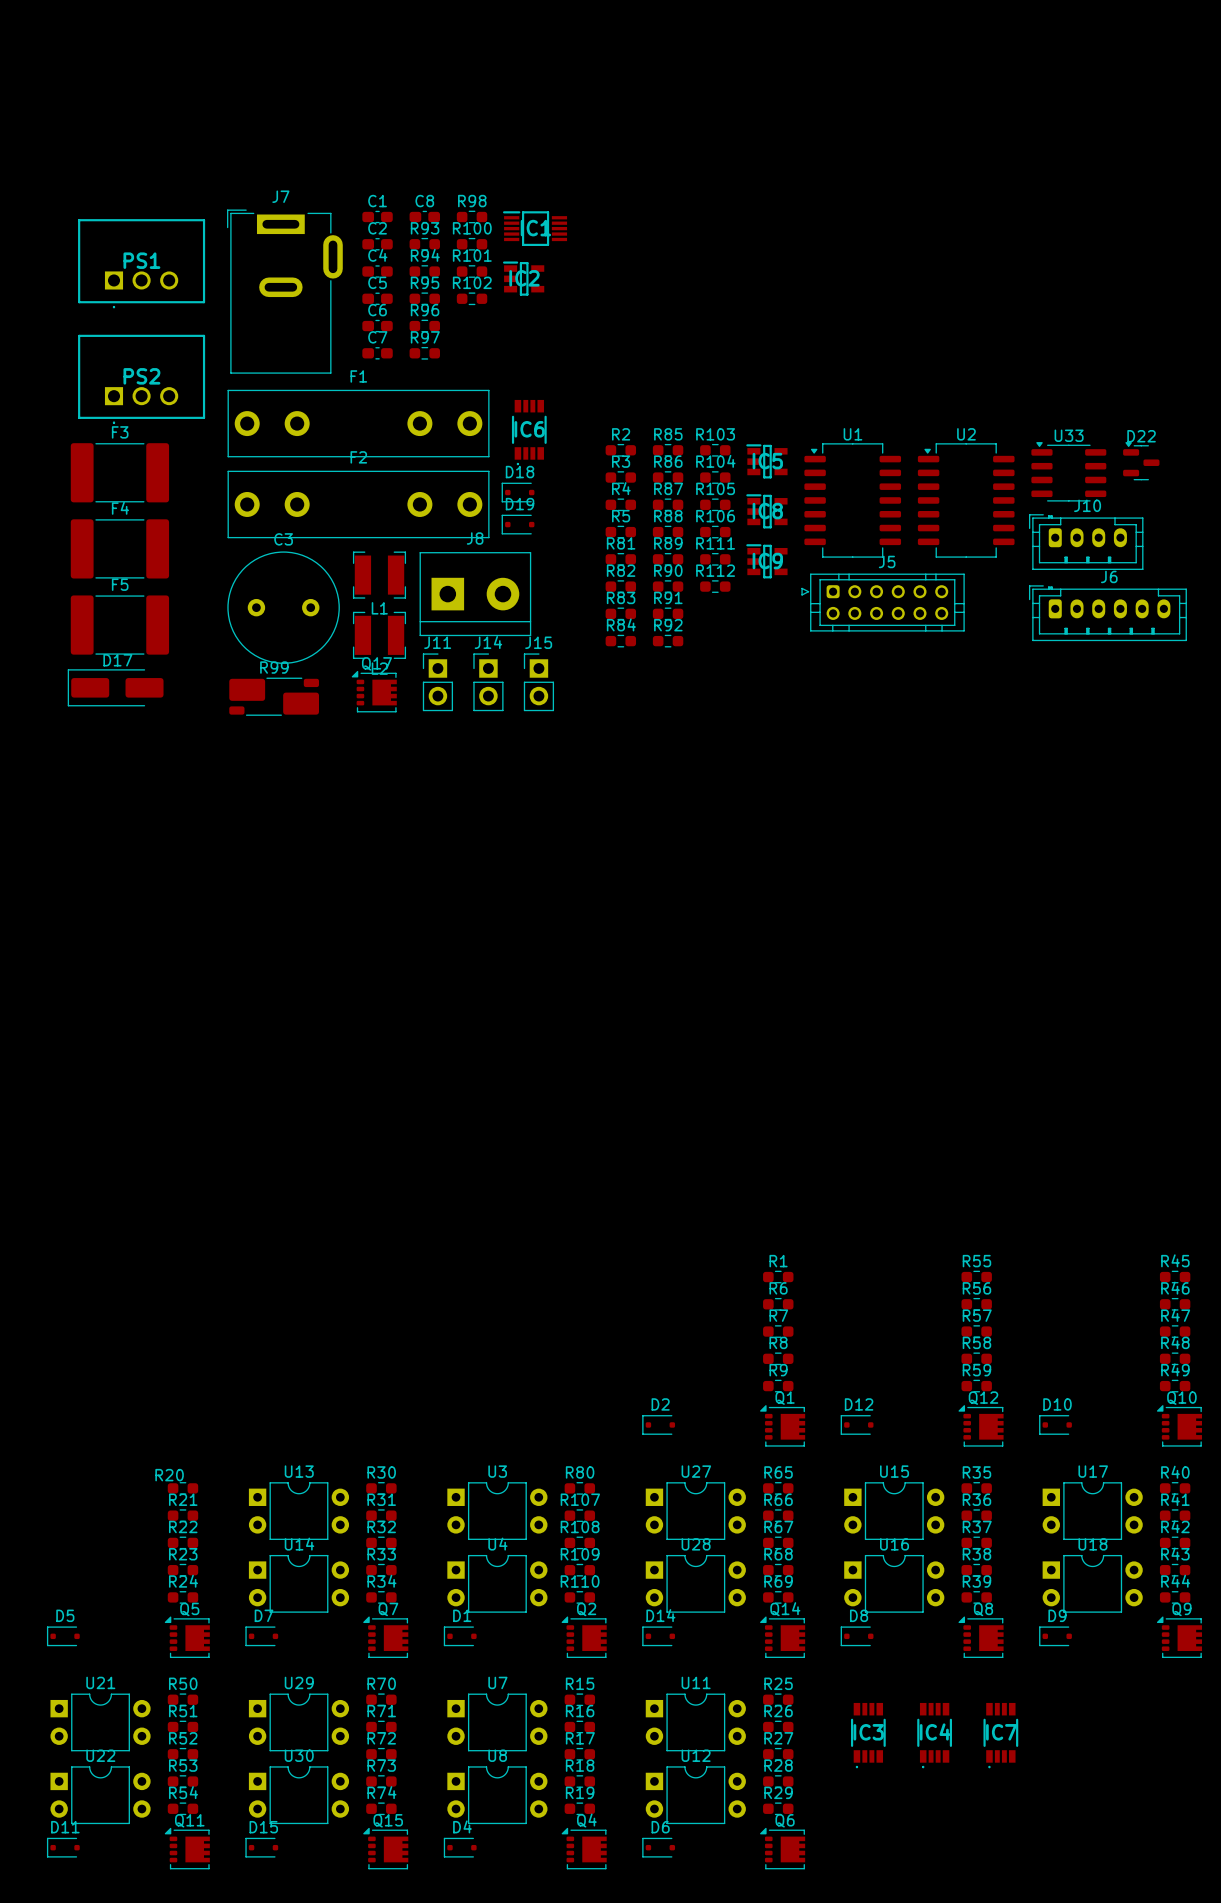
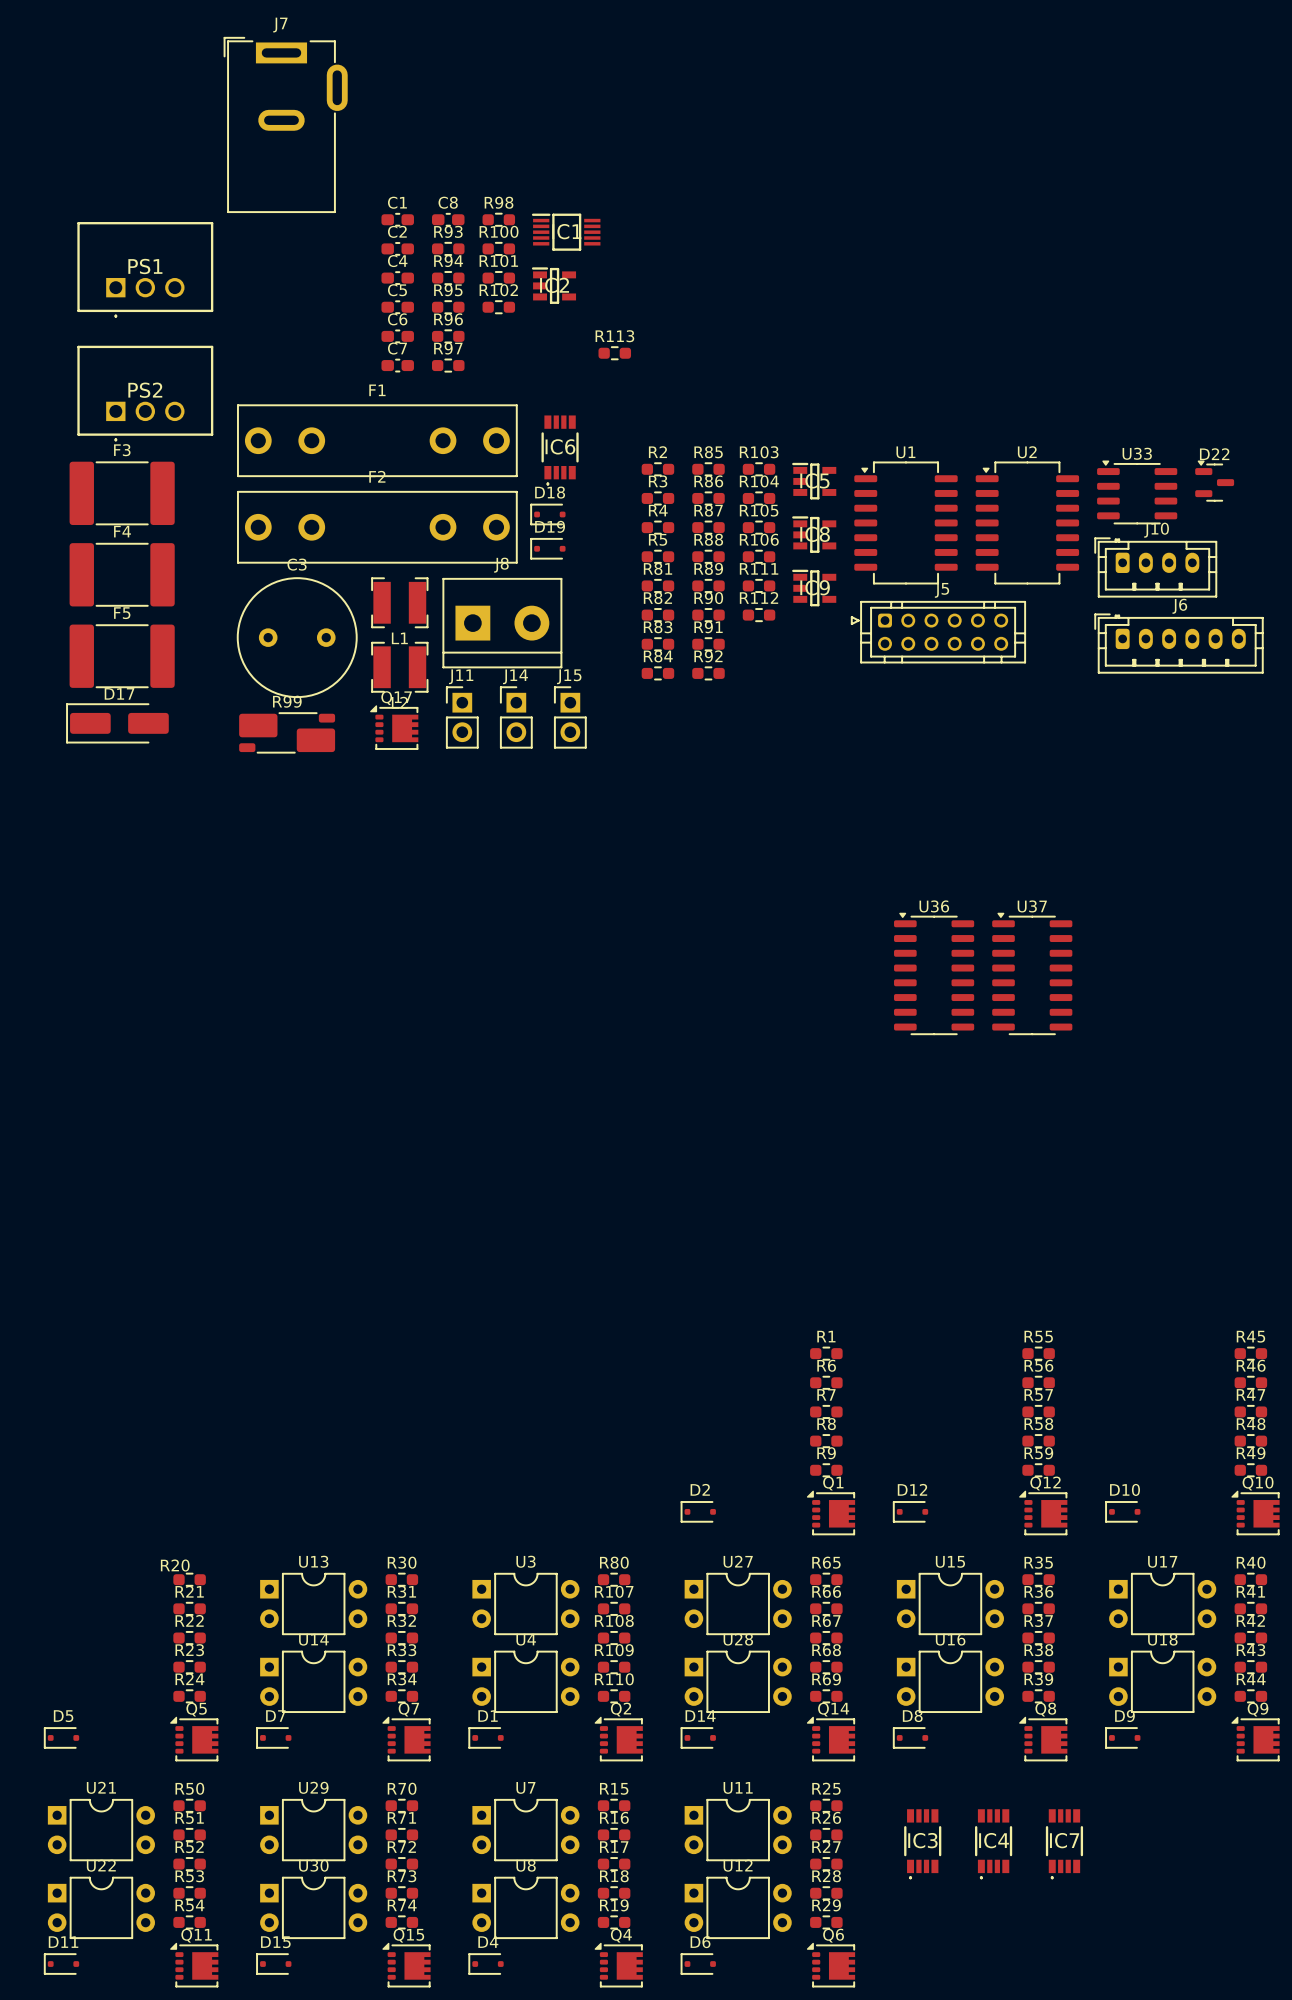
J7 position: (284, 291) -> (285, 124)
R113: none -> (614, 353)
U36: none -> (934, 973)
U37: none -> (1032, 973)

